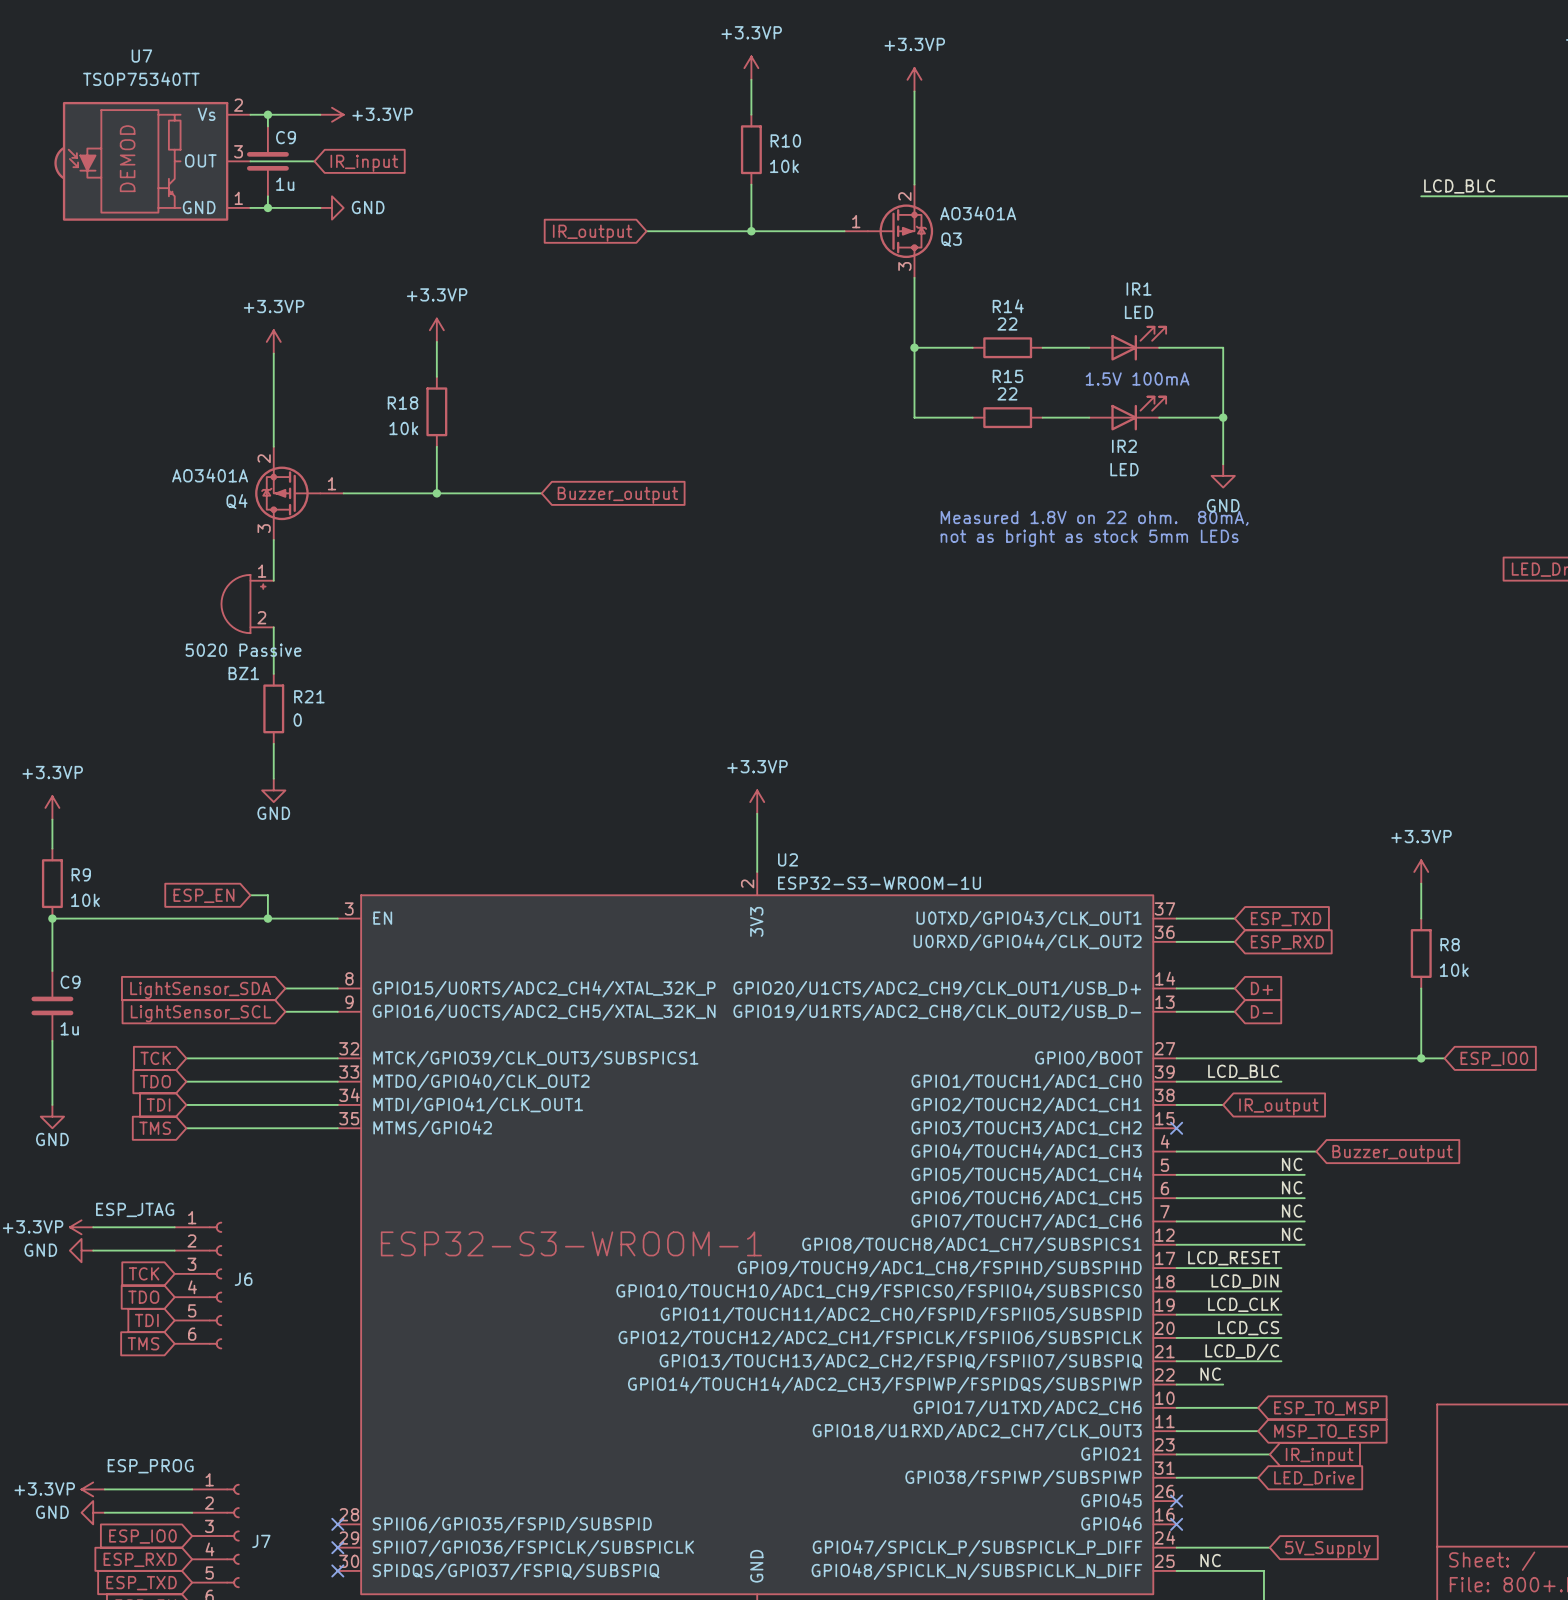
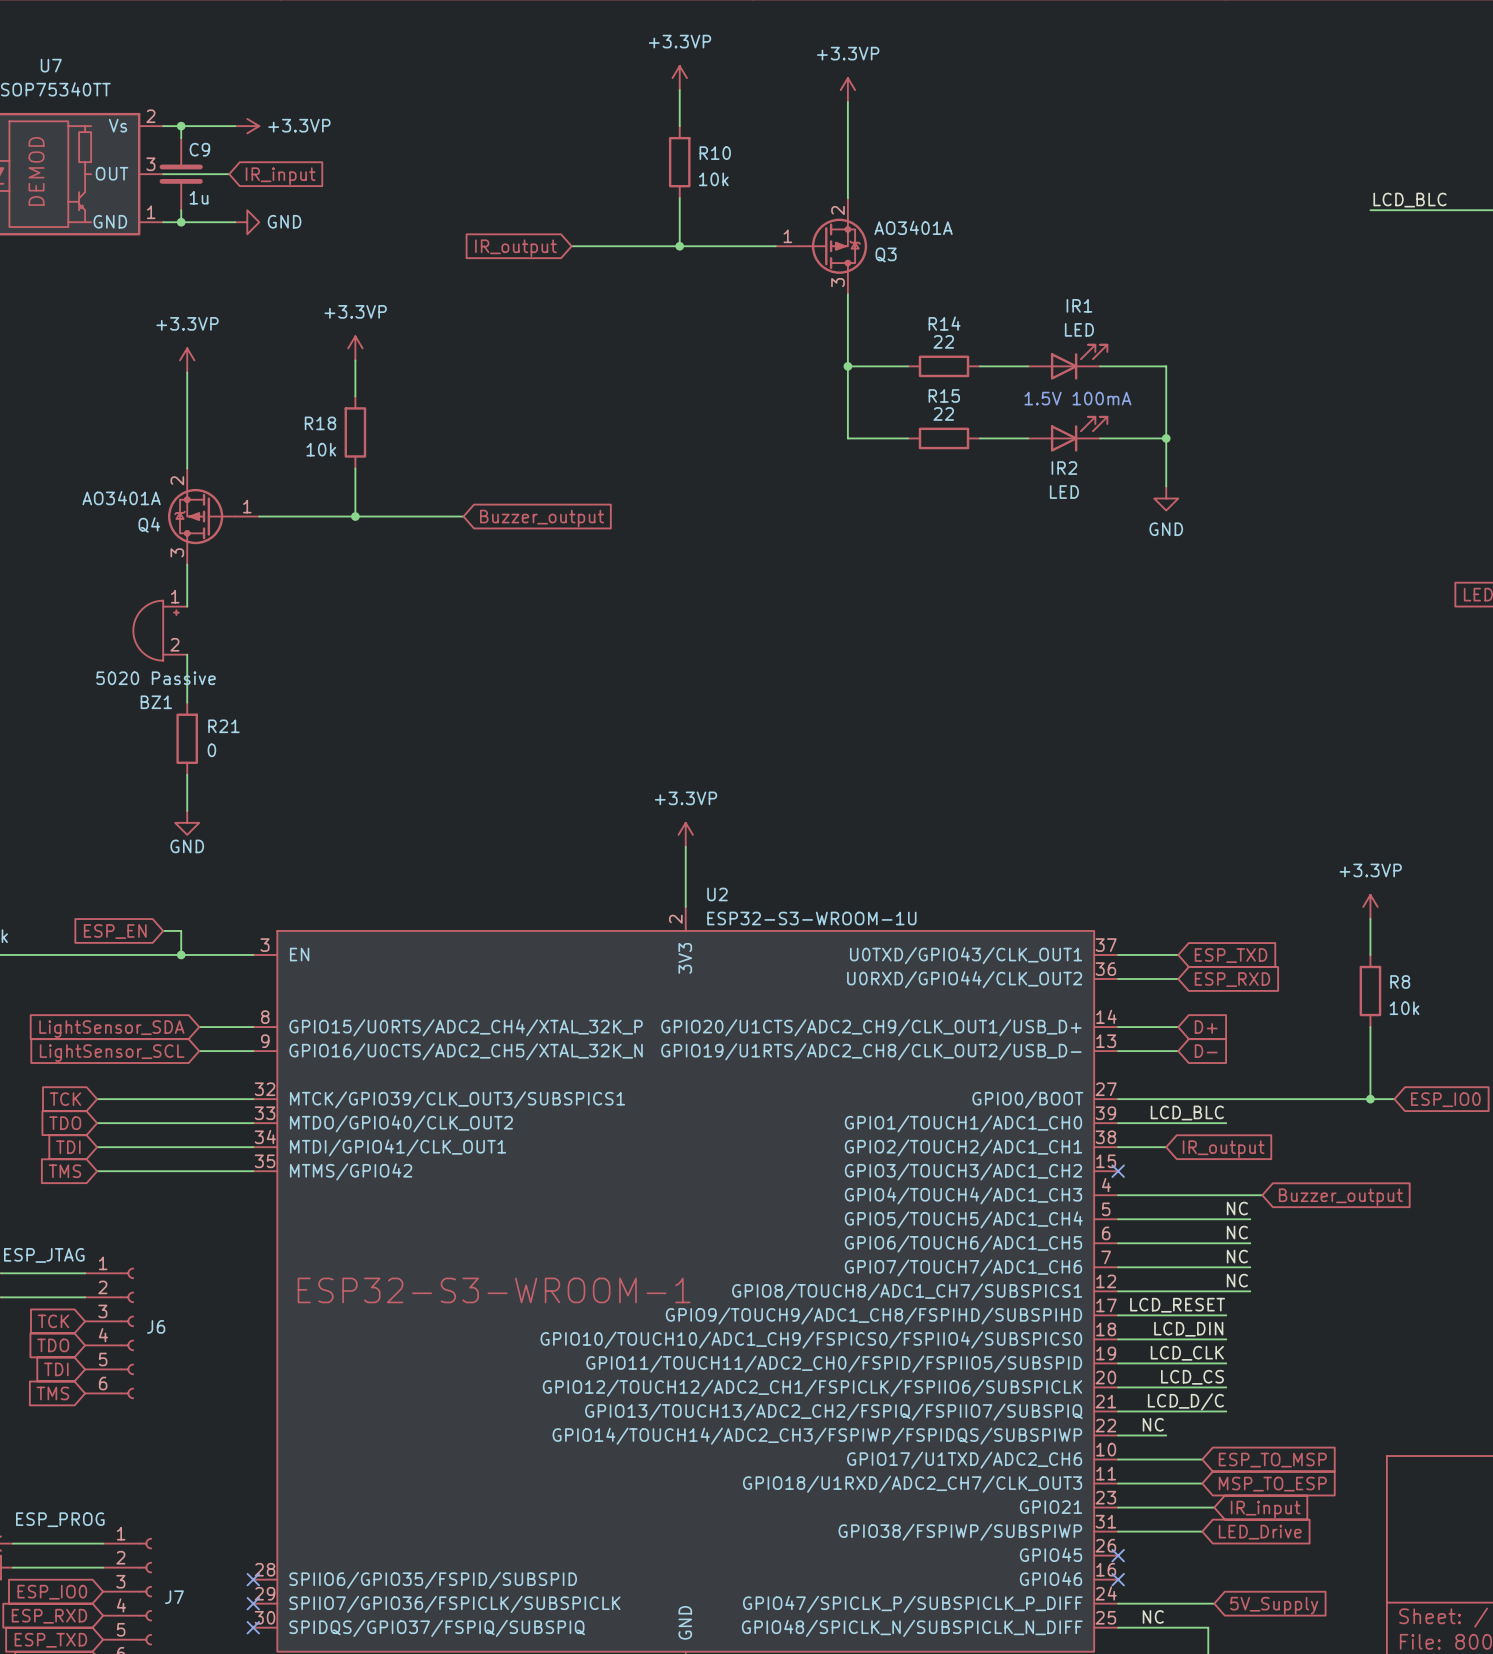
text: Measured 1.8V on 22 ohm. 80mA, (1094, 518) -> none
text: not as bright as stock 5mm LEDs (1089, 538) -> none

